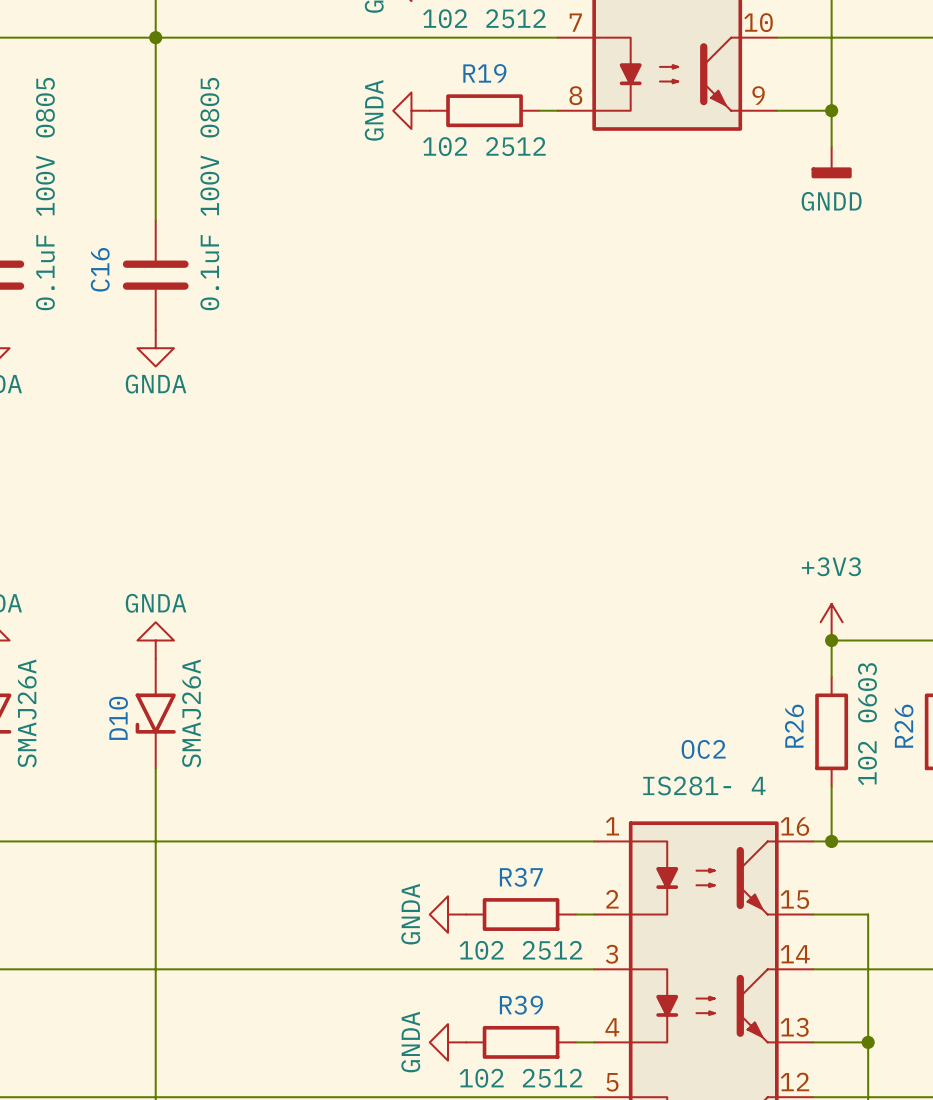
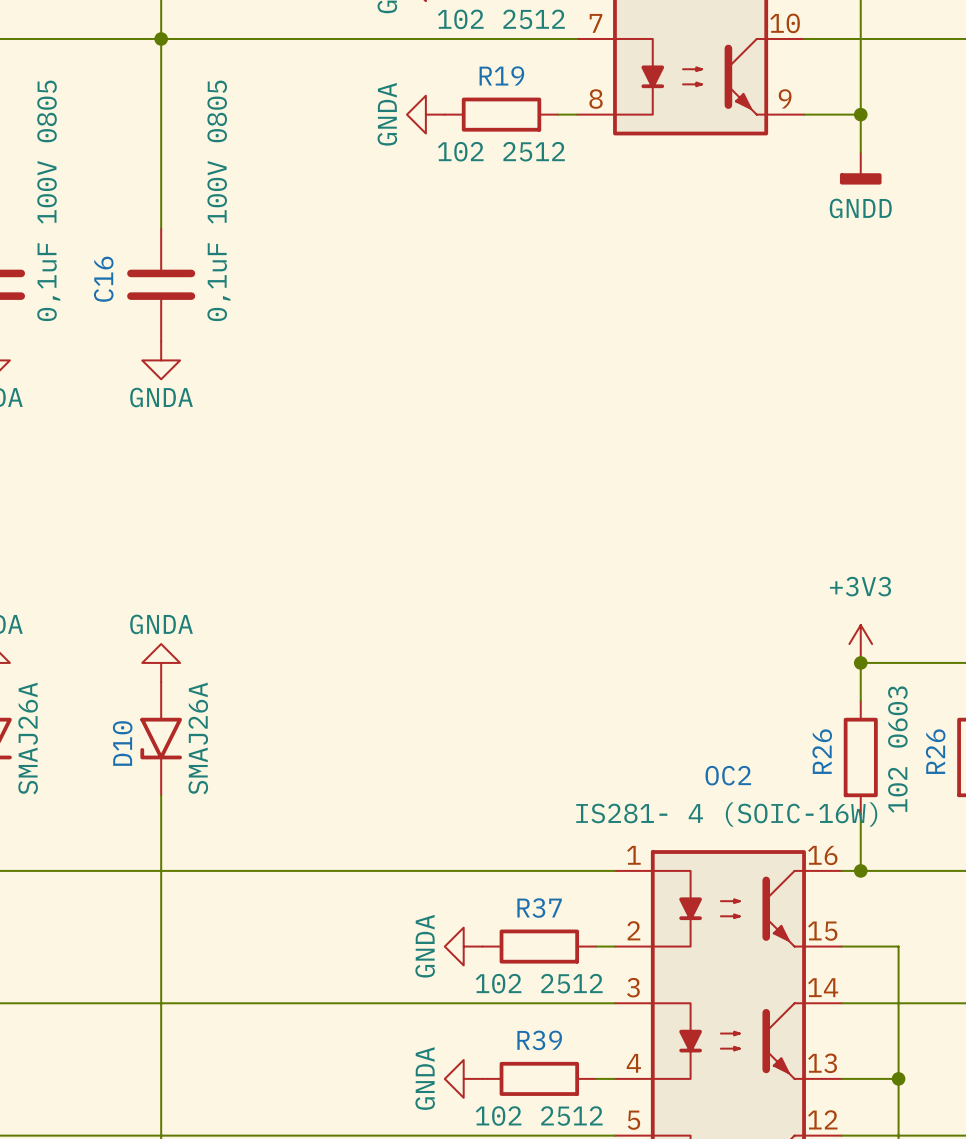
part value: 0.1uF 100V 0805 (45, 194) -> 0,1uF 100V 0805 (48, 200)
C16 value: 0.1uF 100V 0805 (209, 194) -> 0,1uF 100V 0805 (218, 200)
OC2 value: IS281- 4 (704, 785) -> IS281- 4 (SOIC-16W) (726, 814)

